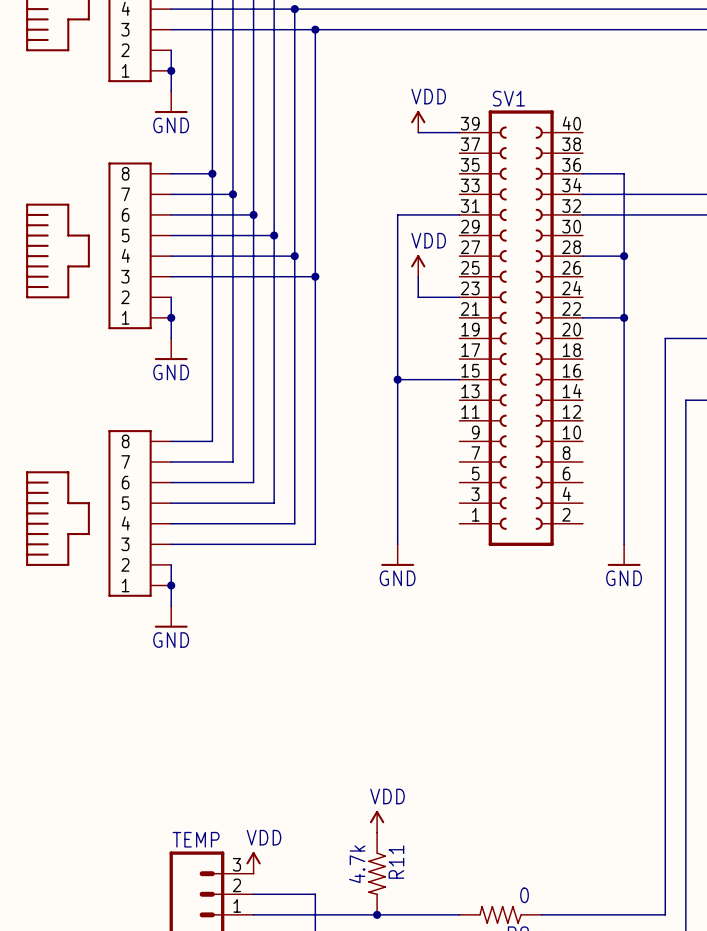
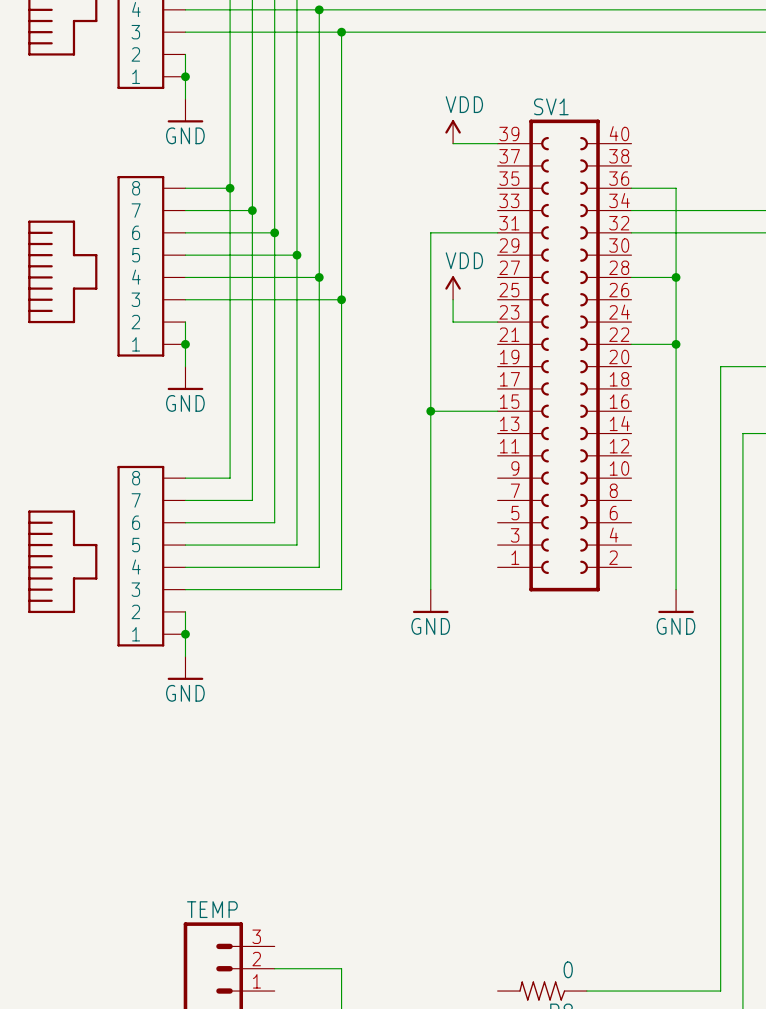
power symbol: VDD (377, 821) -> none
power symbol: VDD (253, 862) -> none
R11: 4.7k (377, 873) -> none
wire: (253, 914) (459, 914) -> none
junction: (377, 914) -> none

